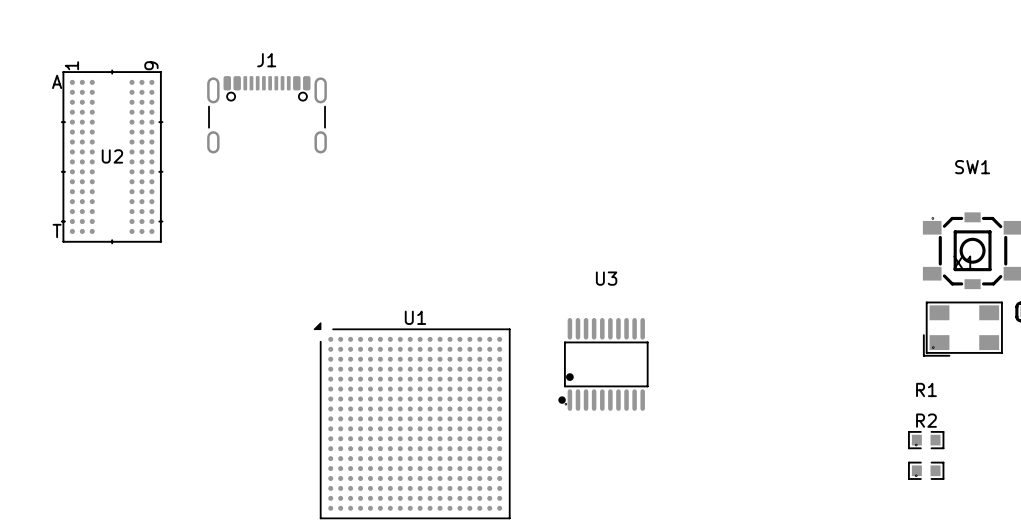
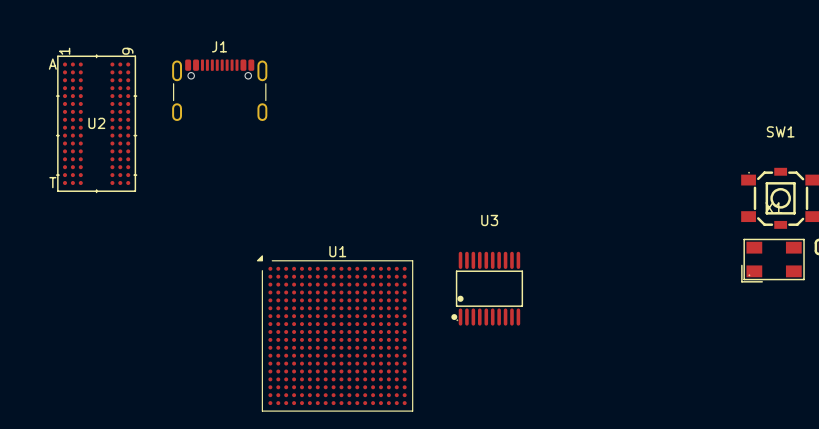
R1: (926, 440) -> none
R2: (926, 470) -> none

